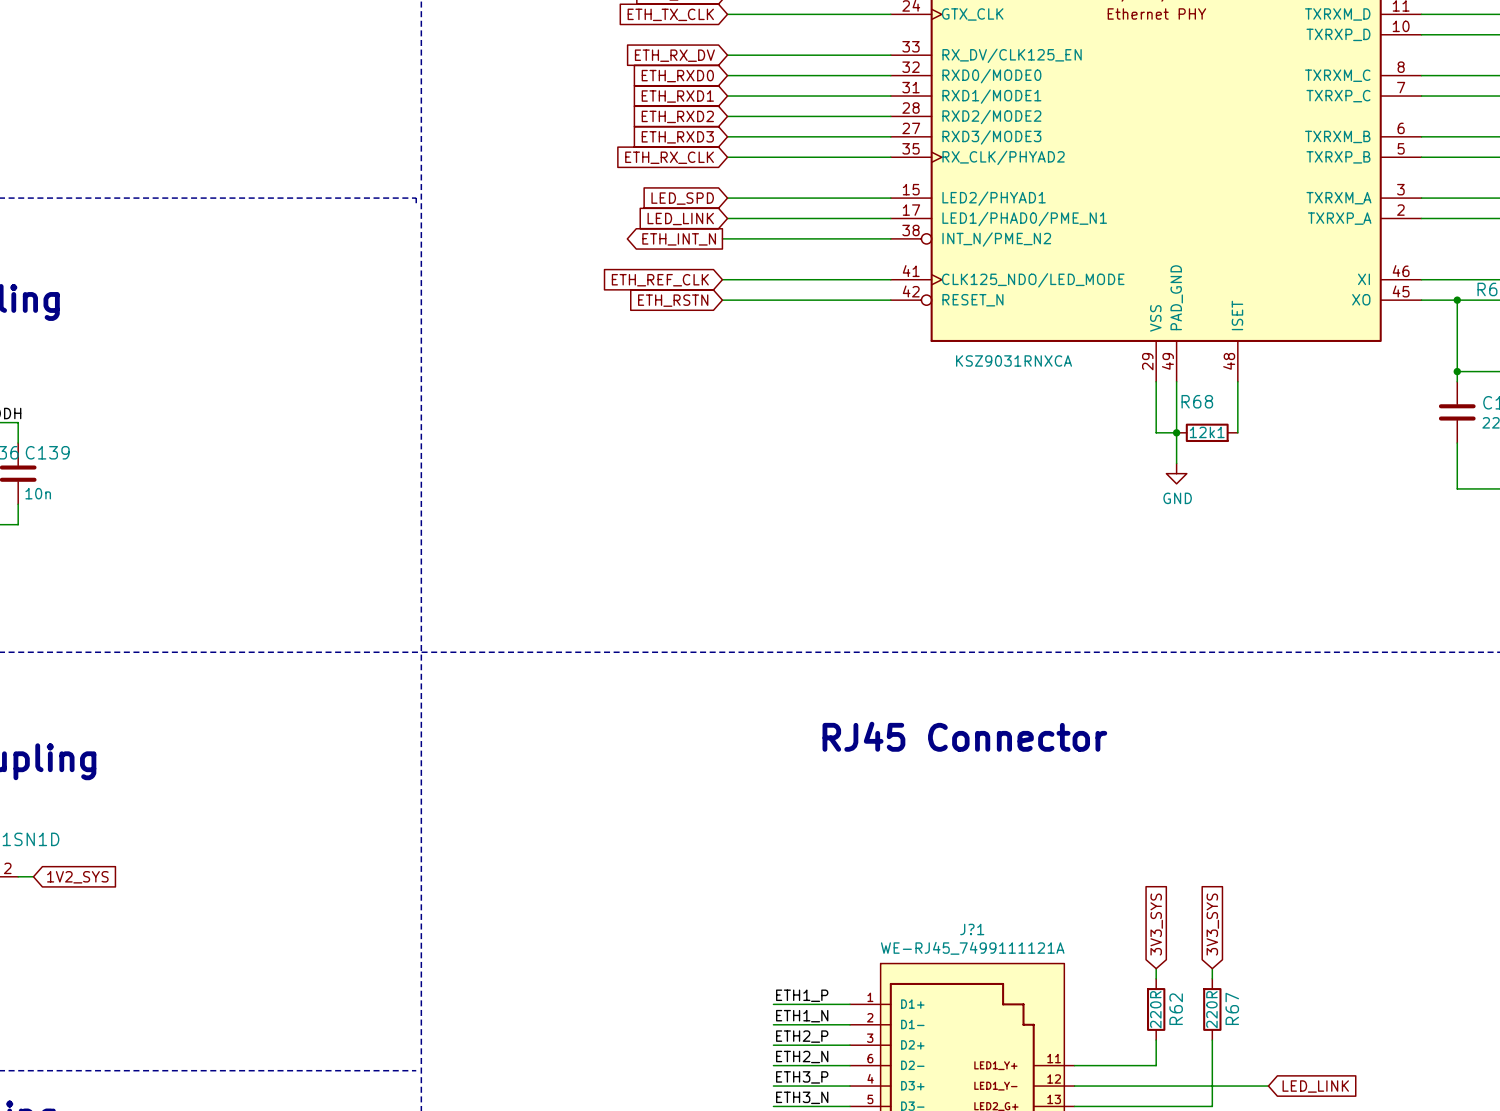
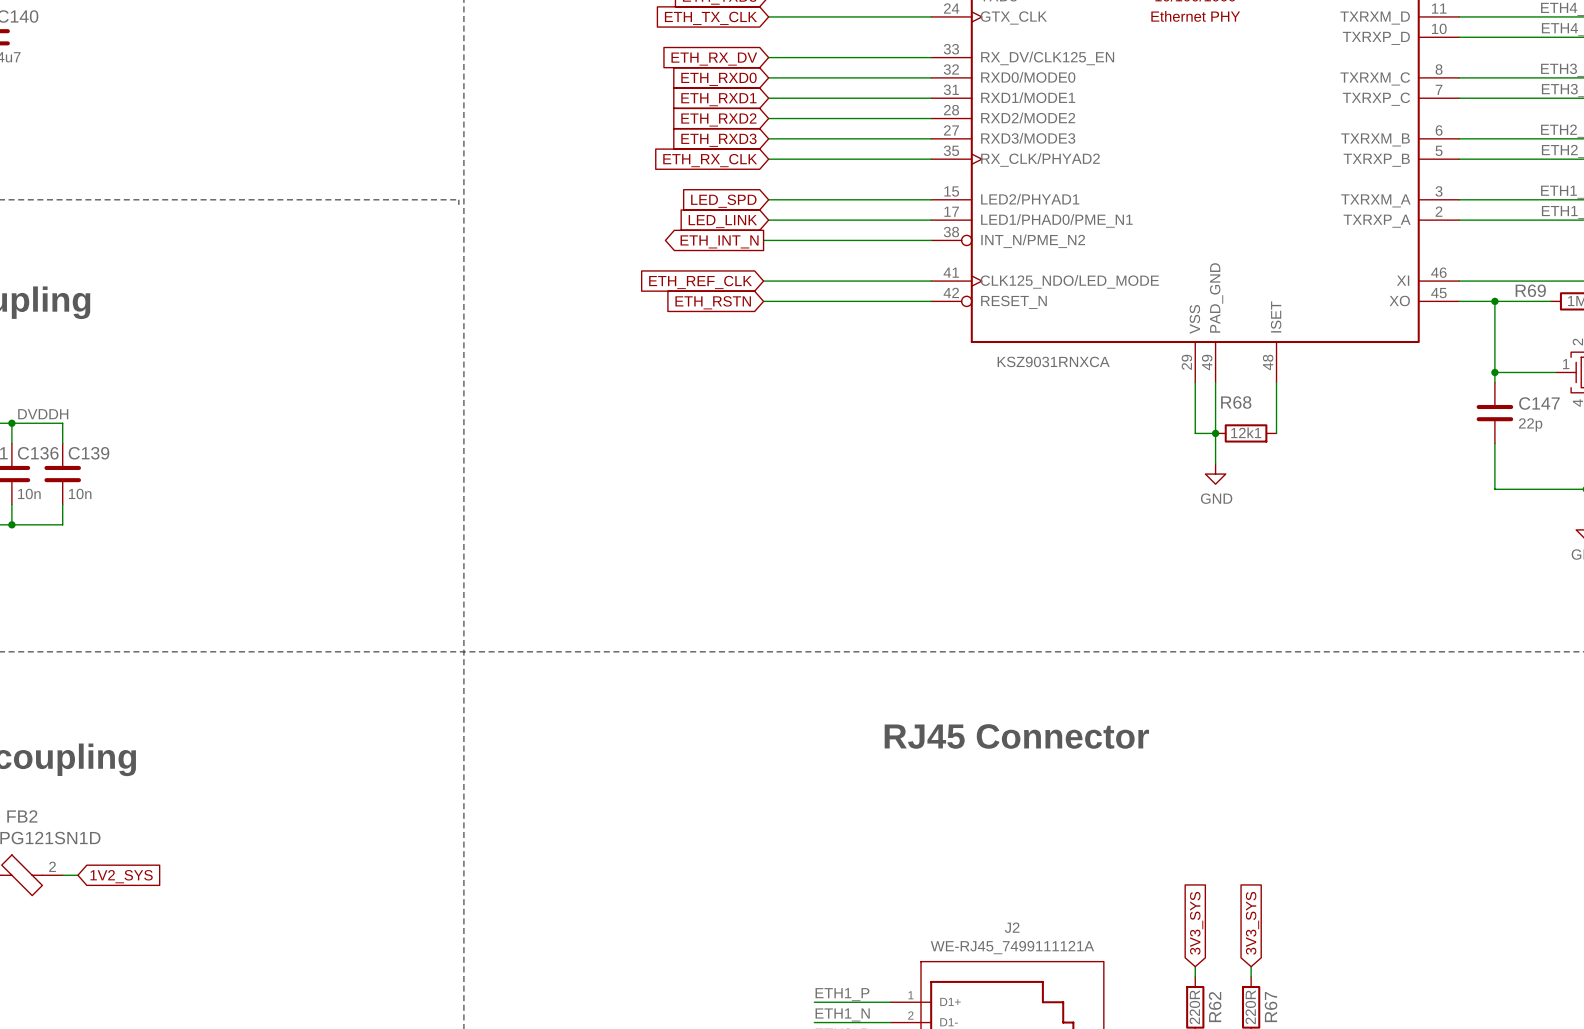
J?1 name: J?1 (972, 929) -> J2 (1012, 927)

